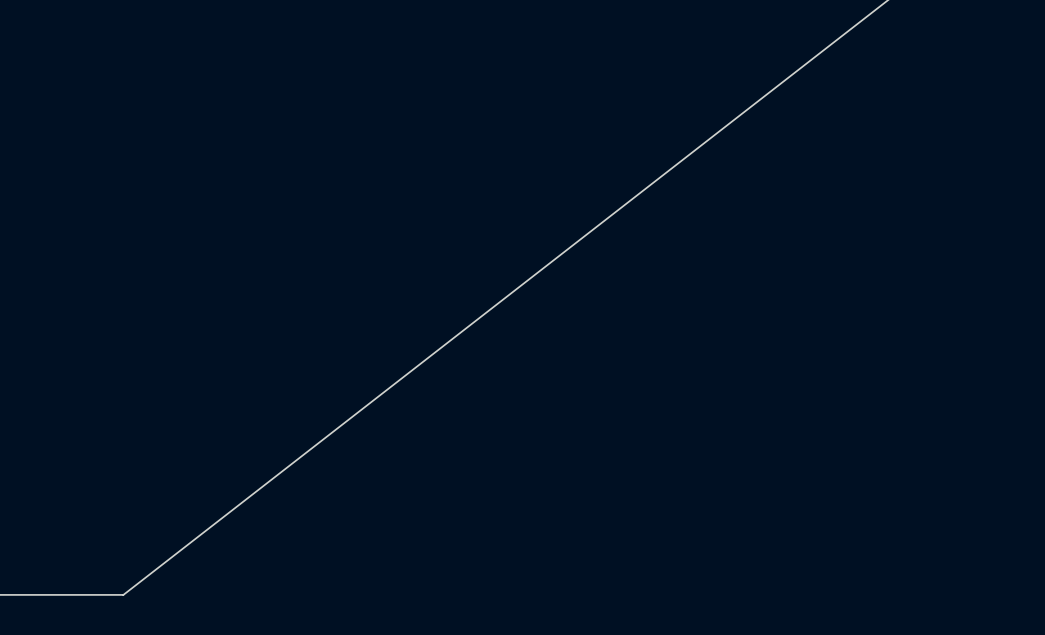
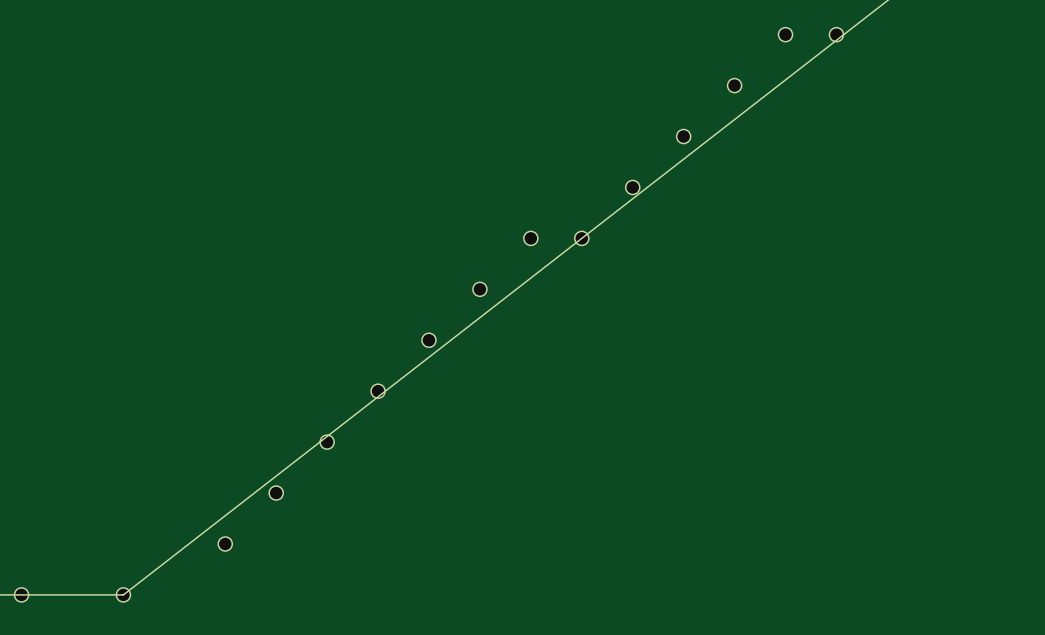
hole: none -> (785, 34)
hole: none -> (836, 34)
hole: none -> (734, 85)
hole: none -> (683, 136)
hole: none -> (632, 187)
hole: none -> (530, 238)
hole: none -> (581, 238)
hole: none -> (479, 289)
hole: none -> (429, 340)
hole: none -> (378, 391)
hole: none -> (327, 442)
hole: none -> (276, 493)
hole: none -> (225, 543)
hole: none -> (21, 594)
hole: none -> (123, 594)

